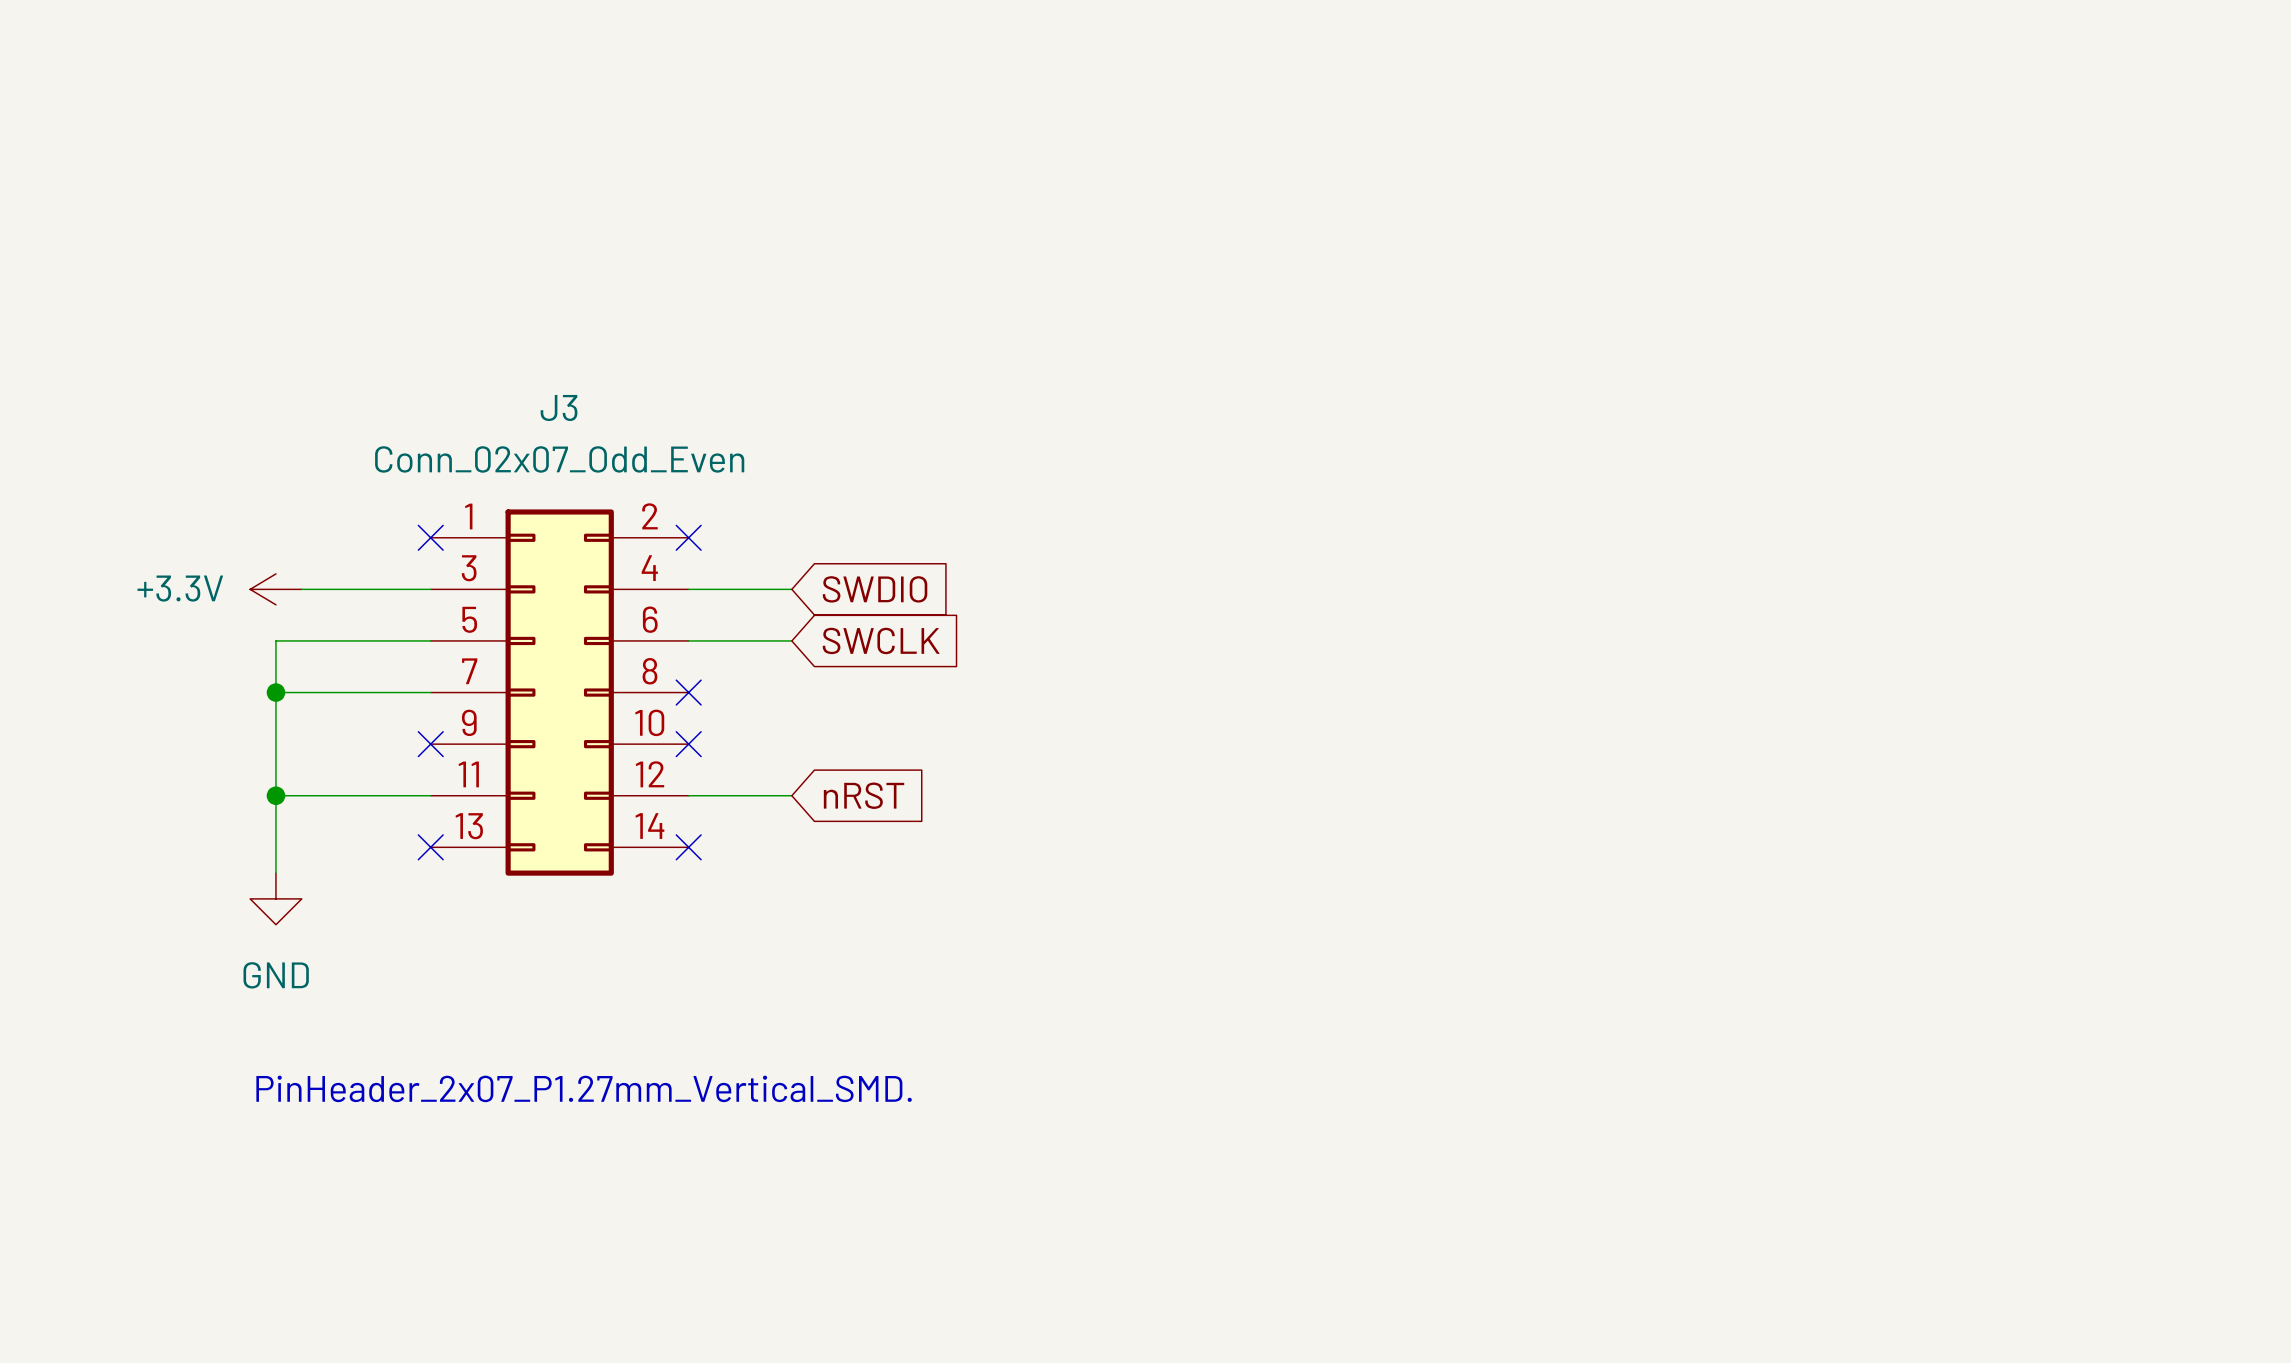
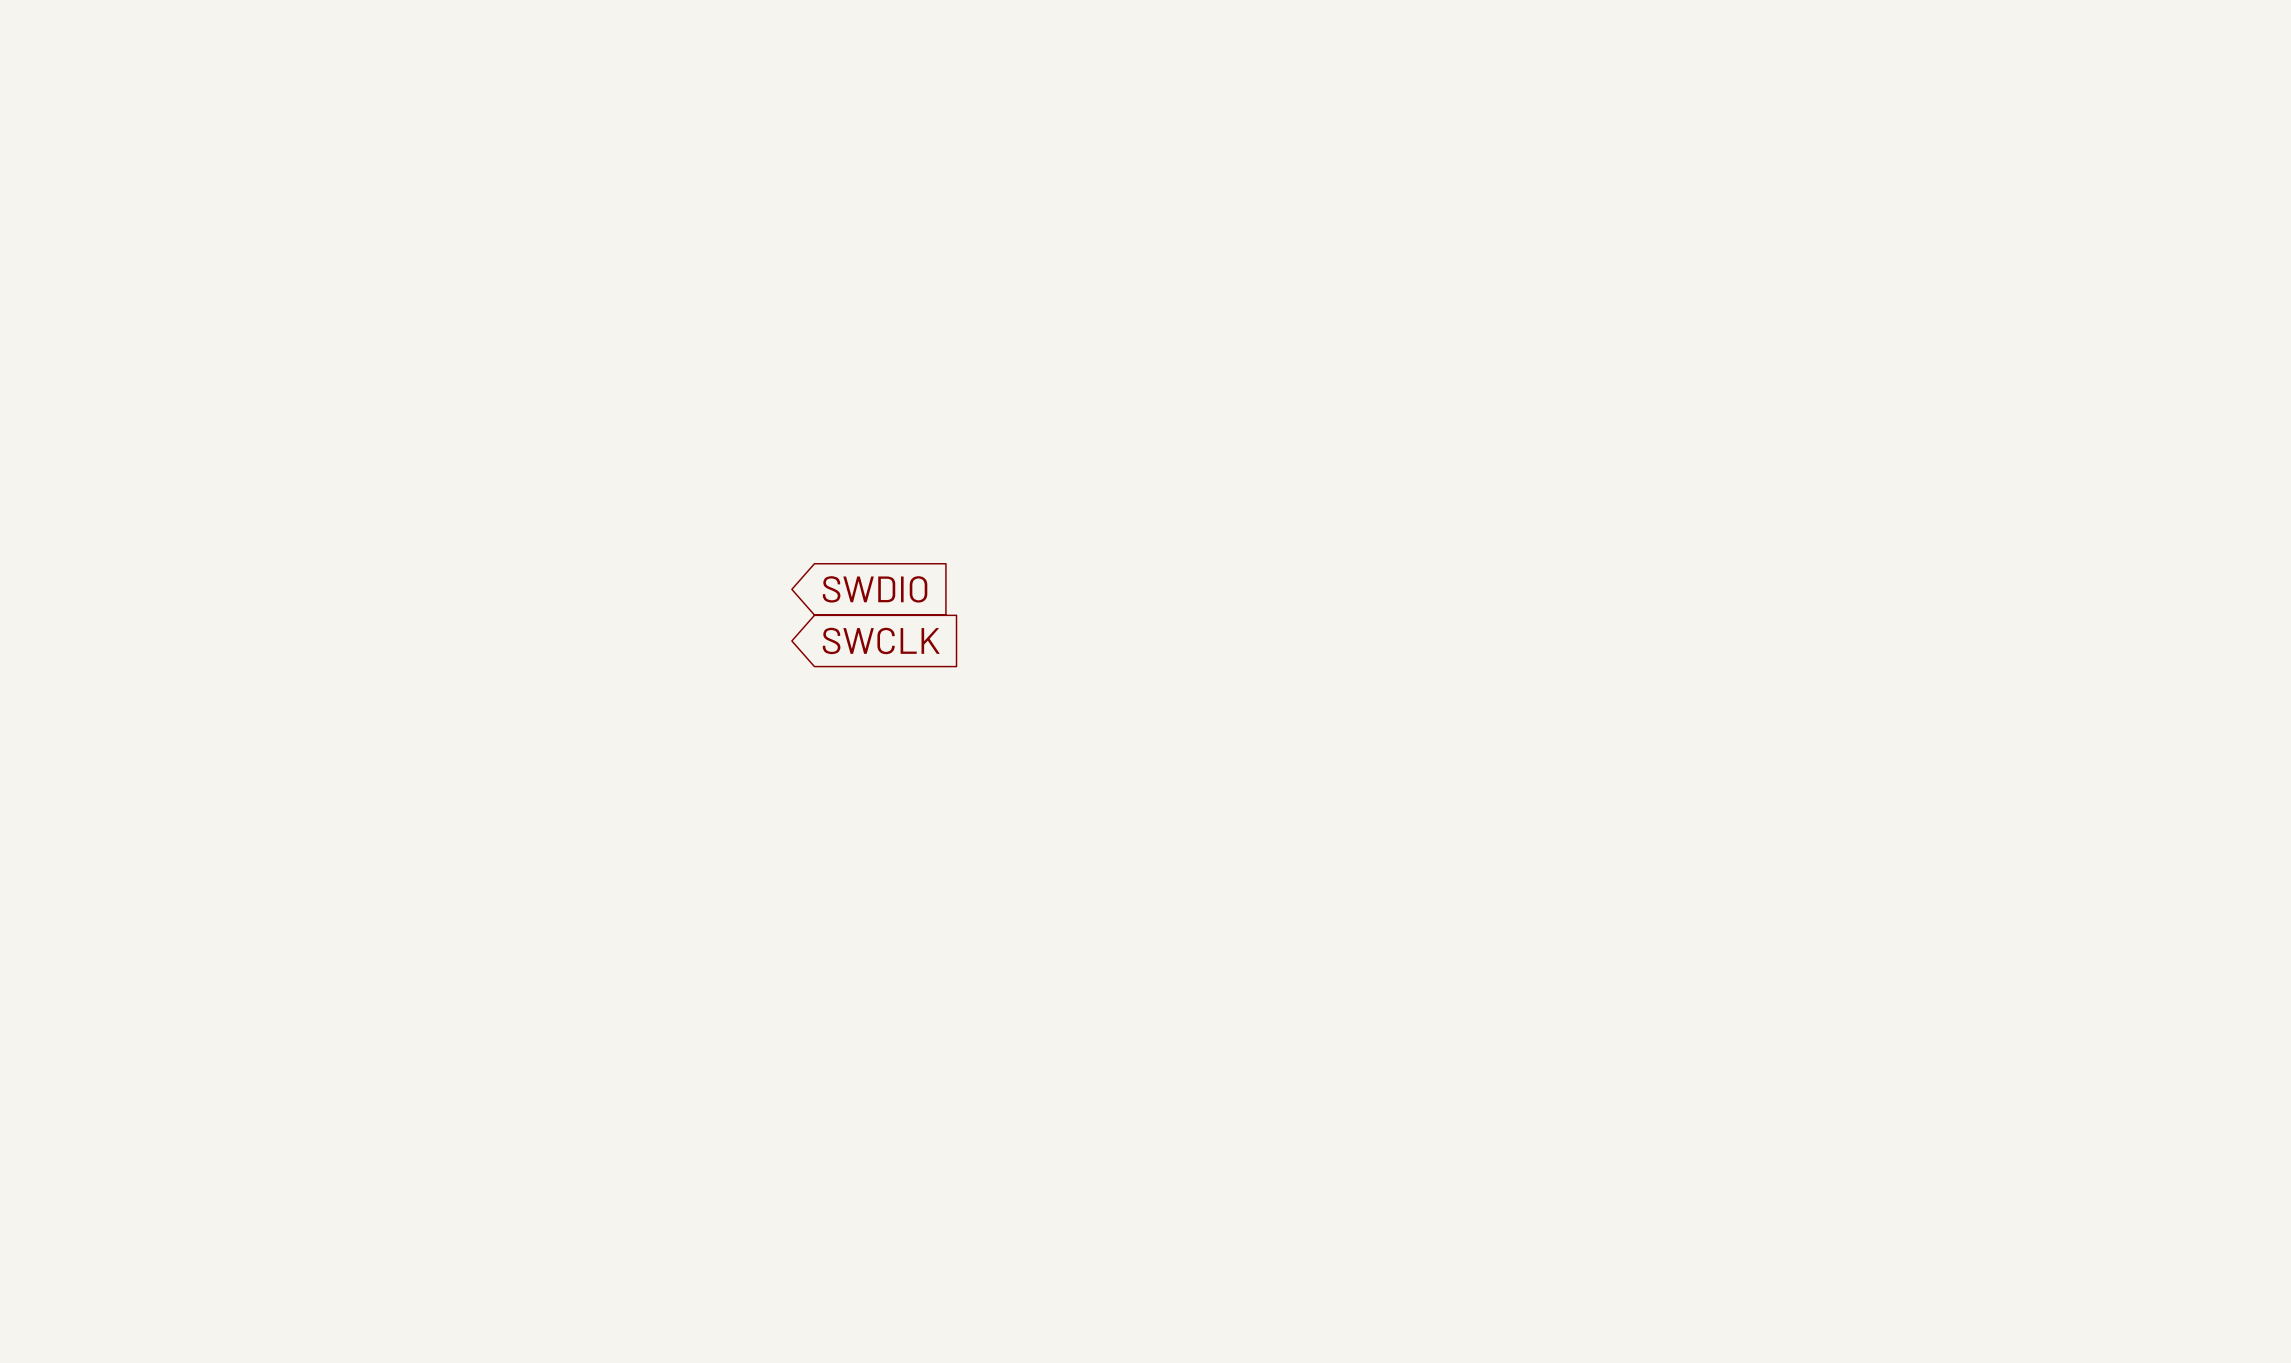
no-connect mark: (430, 537) -> none
no-connect mark: (688, 537) -> none
power symbol: +3.3V (275, 589) -> none
wire: (301, 589) (430, 589) -> none
wire: (688, 589) (791, 589) -> none
wire: (430, 640) (275, 640) (275, 873) -> none
wire: (688, 640) (791, 640) -> none
wire: (275, 692) (430, 692) -> none
junction: (275, 692) -> none
J3: Conn_02x07_Odd_Even (559, 692) -> none
no-connect mark: (688, 692) -> none
no-connect mark: (430, 744) -> none
no-connect mark: (688, 744) -> none
wire: (275, 795) (430, 795) -> none
junction: (275, 795) -> none
wire: (688, 795) (791, 795) -> none
global label: nRST (864, 795) -> none
no-connect mark: (430, 847) -> none
no-connect mark: (688, 847) -> none
power symbol: GND (275, 898) -> none
text: PinHeader_2x07_P1.27mm_Vertical_SMD. (584, 1088) -> none

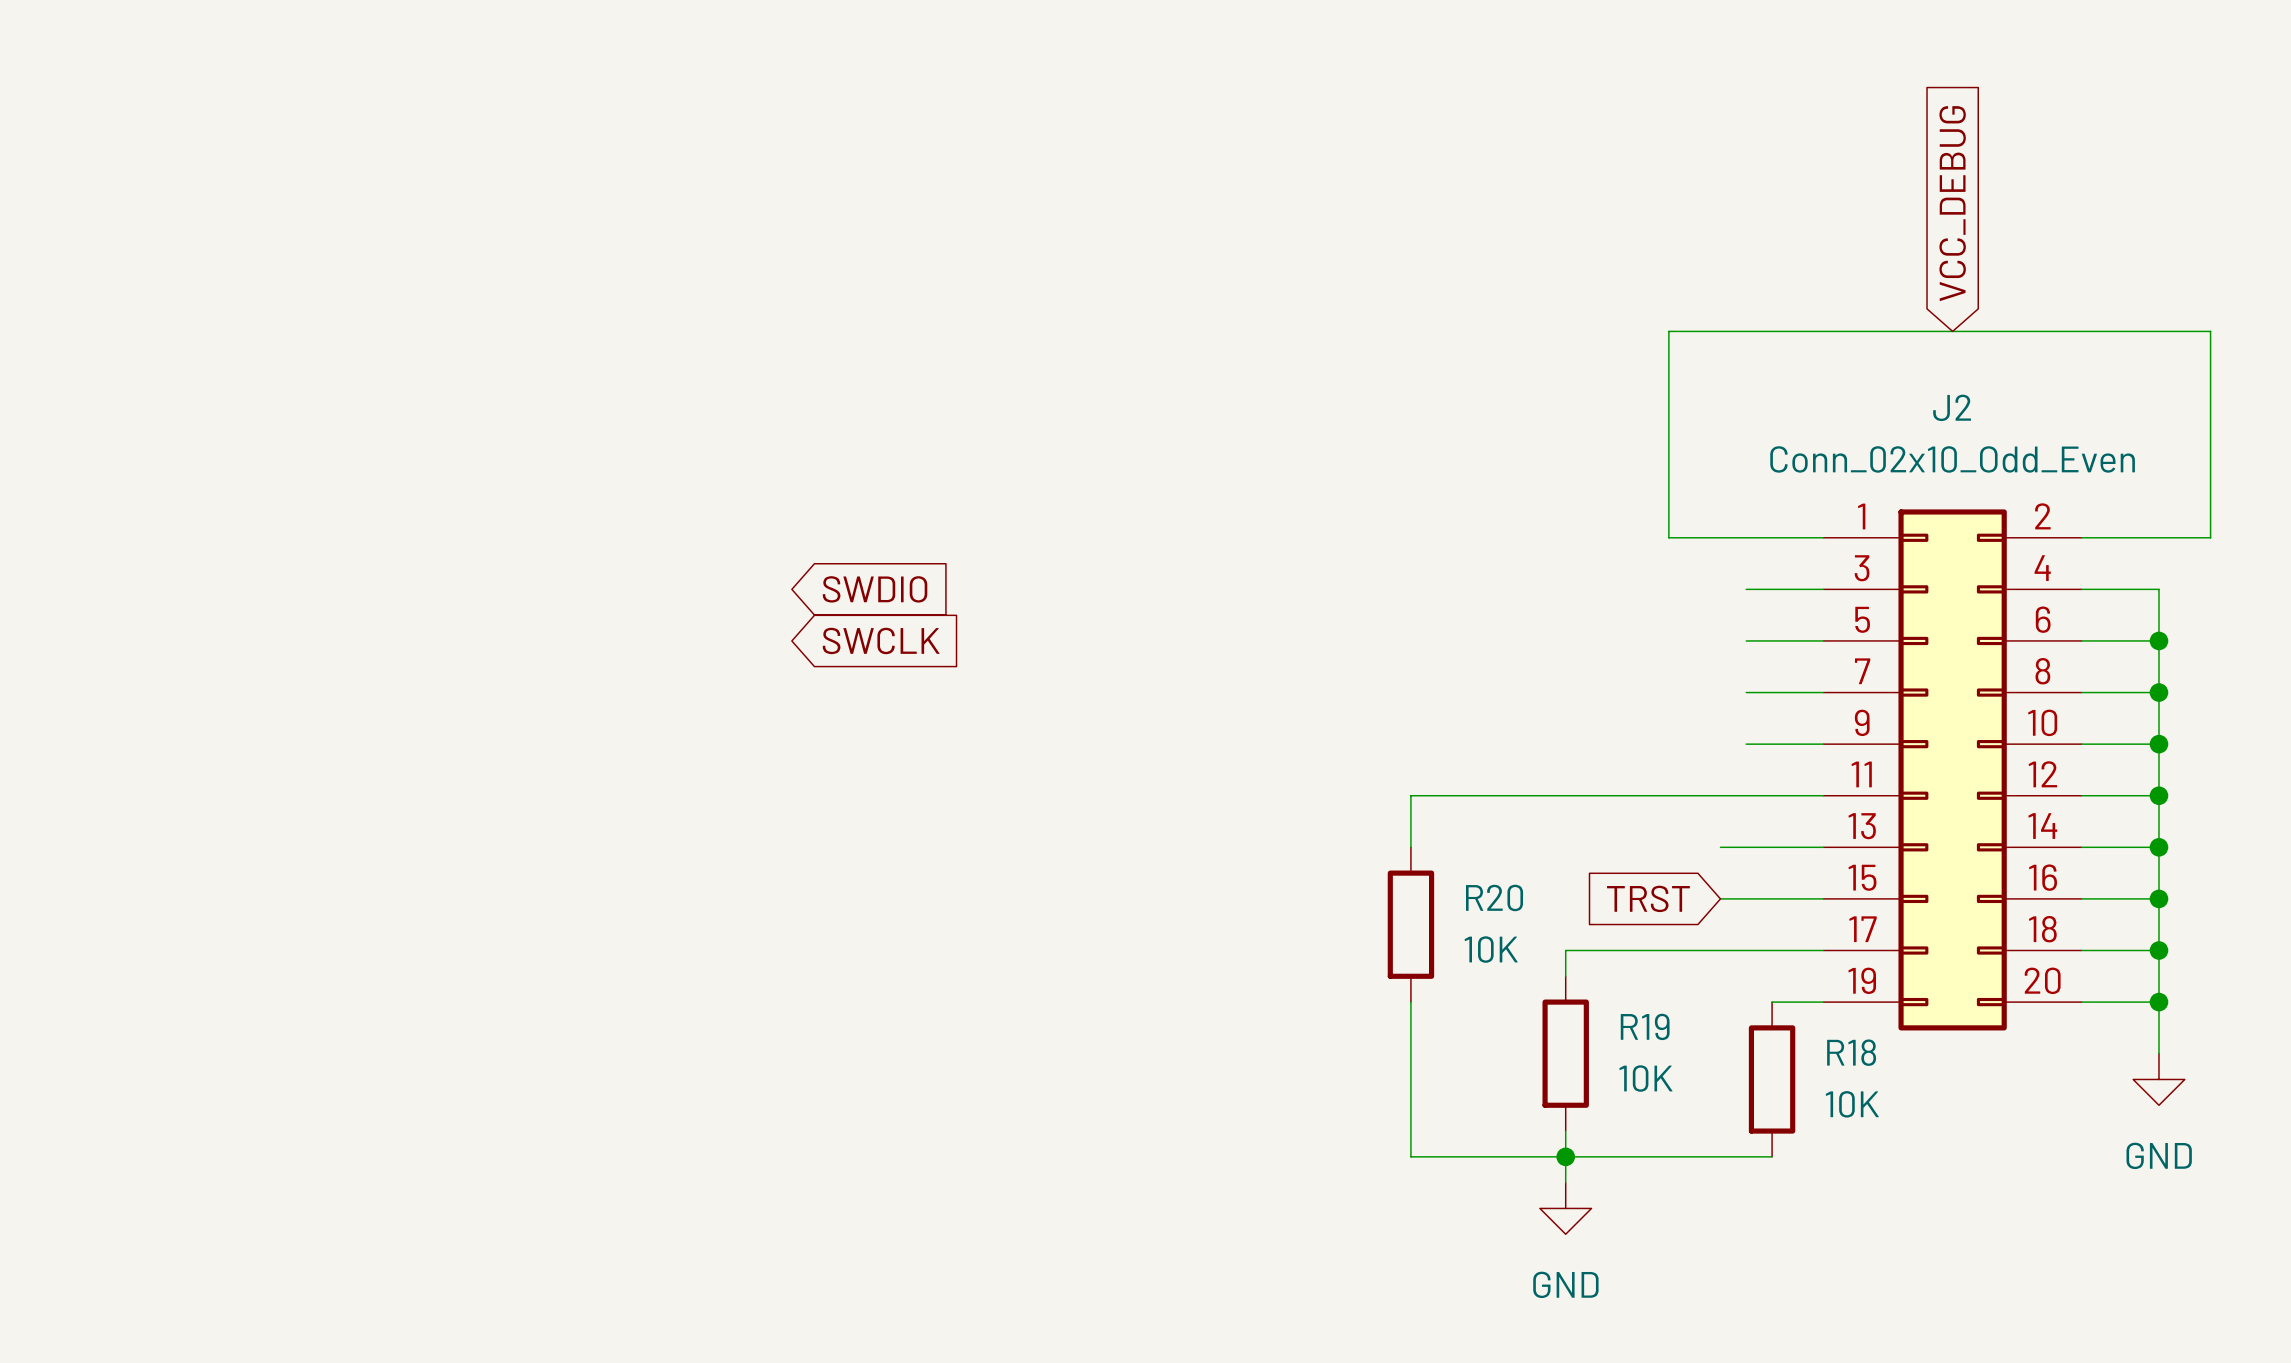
global label: none -> VCC_DEBUG (1952, 203)
wire: none -> (1823, 537) (1668, 537) (1668, 331) (2210, 331) (2210, 537) (2081, 537)
wire: none -> (1746, 589) (1823, 589)
wire: none -> (2081, 589) (2158, 589) (2158, 1053)
wire: none -> (1746, 640) (1823, 640)
wire: none -> (2081, 640) (2158, 640)
junction: none -> (2158, 640)
wire: none -> (1746, 692) (1823, 692)
wire: none -> (2081, 692) (2158, 692)
junction: none -> (2158, 692)
wire: none -> (1746, 744) (1823, 744)
wire: none -> (2081, 744) (2158, 744)
junction: none -> (2158, 744)
J2: none -> Conn_02x10_Odd_Even (1952, 769)
wire: none -> (1823, 795) (1410, 795) (1410, 847)
wire: none -> (2081, 795) (2158, 795)
junction: none -> (2158, 795)
wire: none -> (1720, 847) (1823, 847)
wire: none -> (2081, 847) (2158, 847)
junction: none -> (2158, 847)
global label: none -> TRST (1648, 898)
wire: none -> (1720, 898) (1823, 898)
wire: none -> (2081, 898) (2158, 898)
junction: none -> (2158, 898)
R20: none -> 10K (1410, 924)
wire: none -> (1823, 950) (1565, 950) (1565, 976)
wire: none -> (2081, 950) (2158, 950)
junction: none -> (2158, 950)
wire: none -> (1410, 1002) (1410, 1156) (1772, 1156)
wire: none -> (1772, 1002) (1823, 1002)
wire: none -> (2081, 1002) (2158, 1002)
junction: none -> (2158, 1002)
R19: none -> 10K (1565, 1053)
R18: none -> 10K (1772, 1079)
power symbol: none -> GND (2158, 1079)
wire: none -> (1565, 1131) (1565, 1182)
junction: none -> (1565, 1156)
power symbol: none -> GND (1565, 1208)

